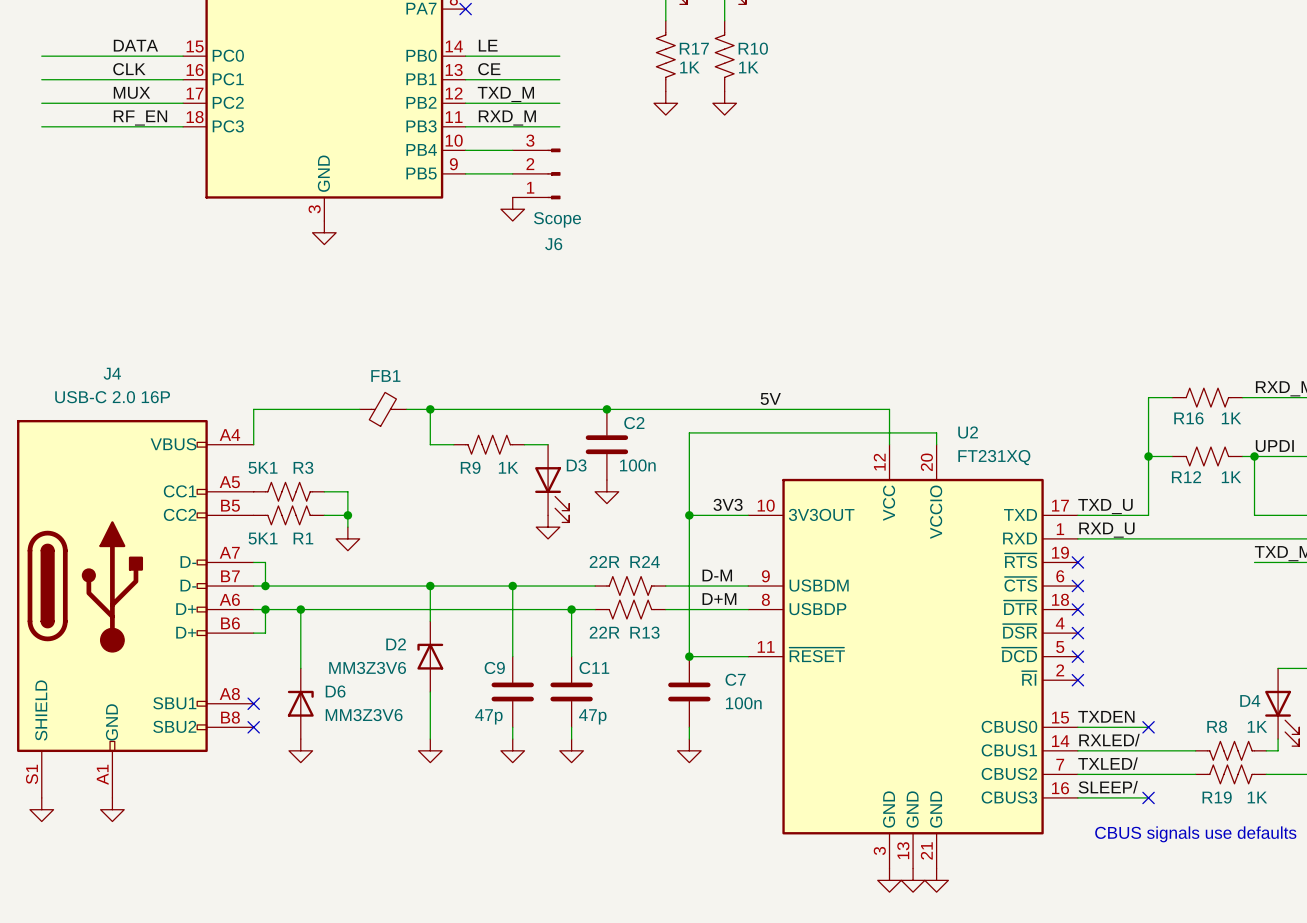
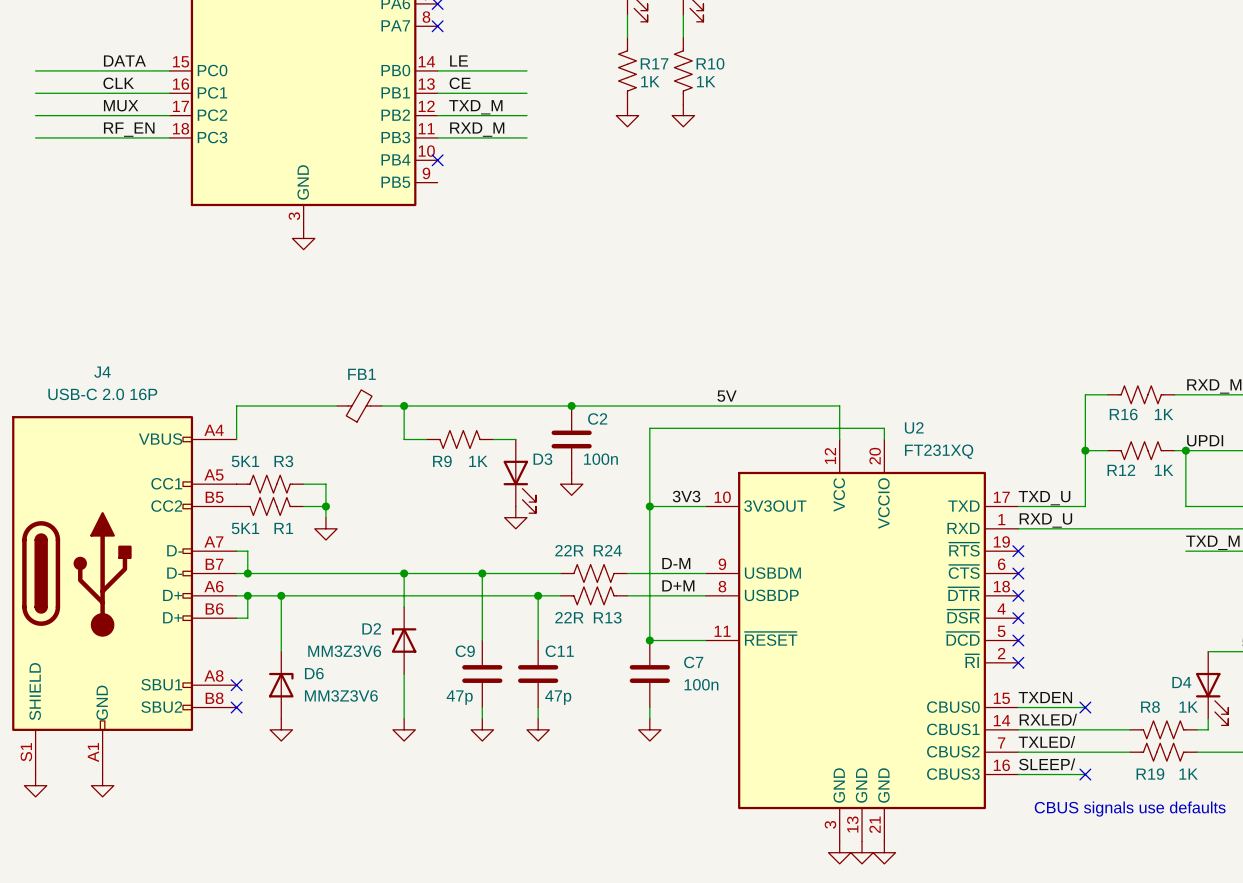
wire: (465, 150) (512, 150) -> none
no-connect mark: none -> (437, 160)
wire: (465, 173) (512, 173) -> none
J6: Scope (536, 173) -> none
power symbol: (512, 209) -> none

